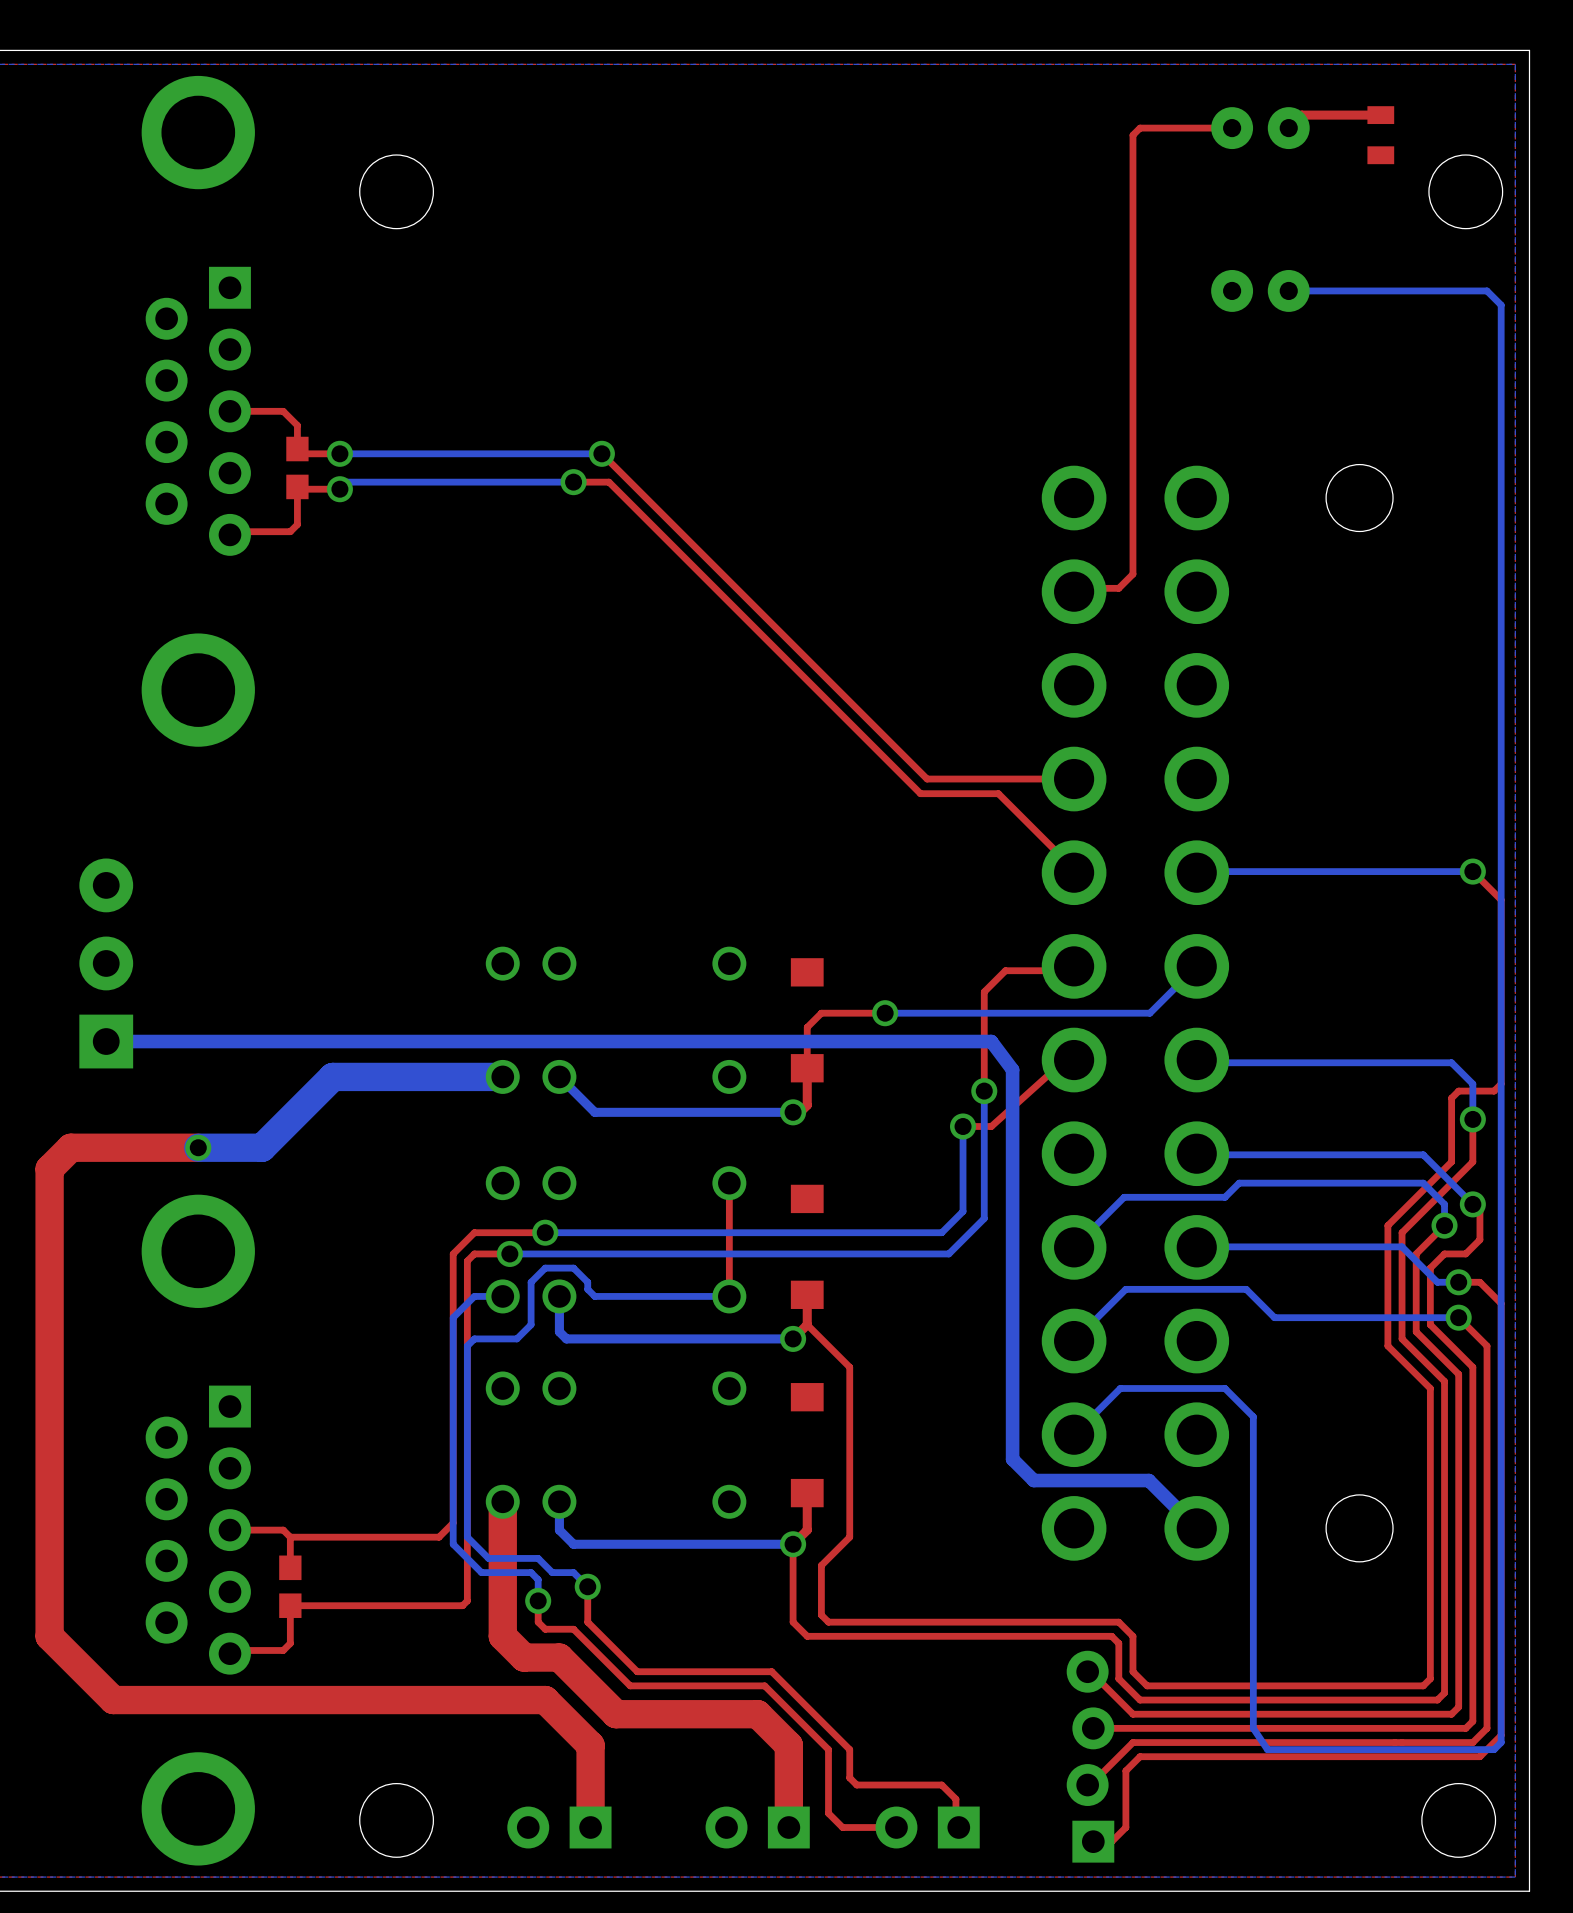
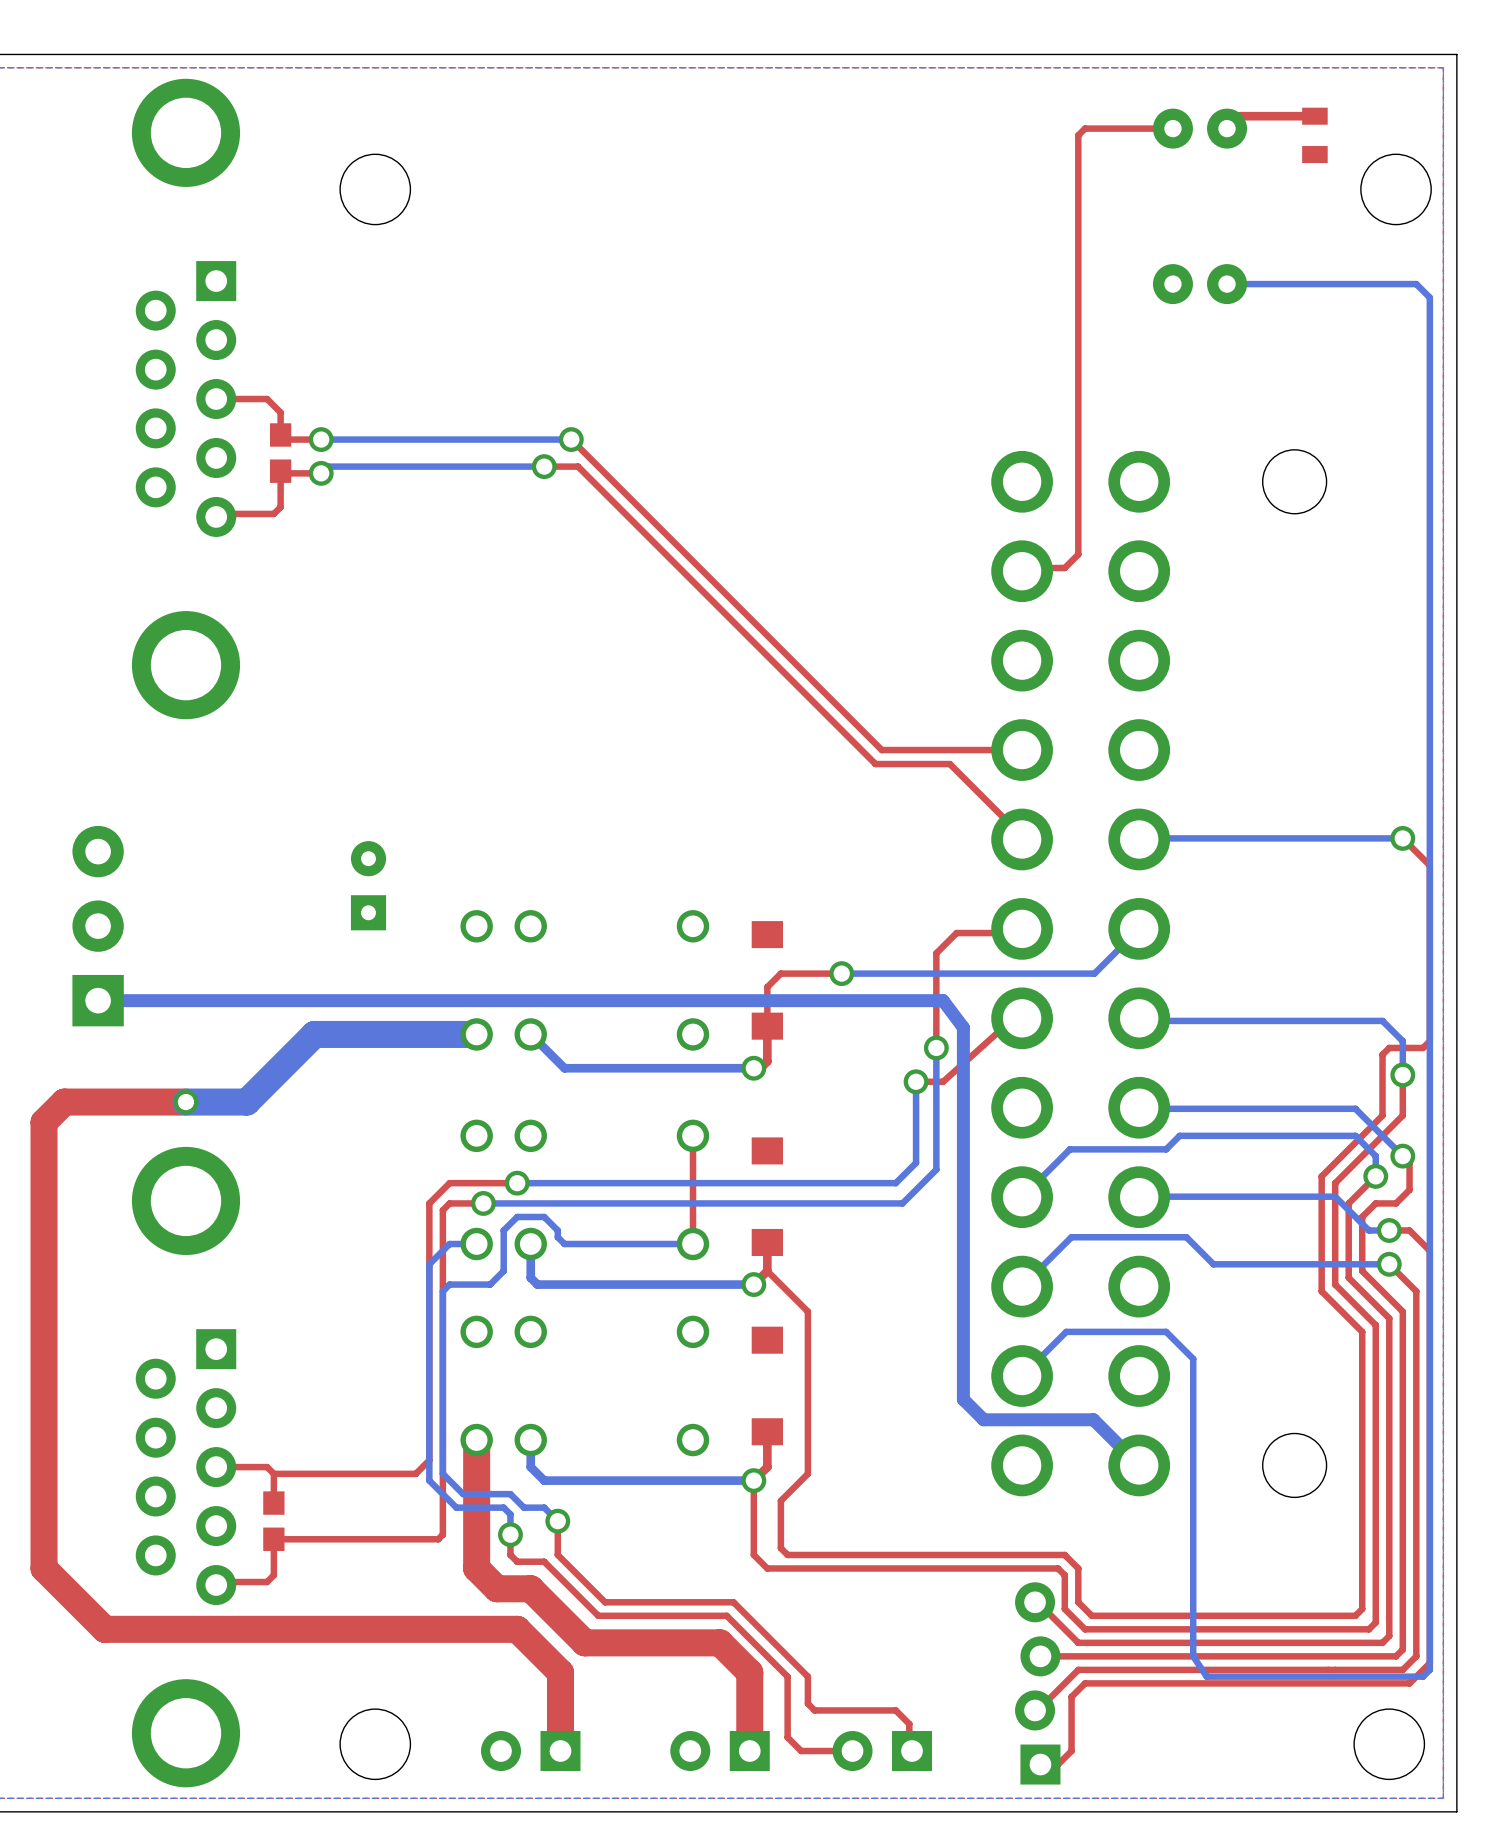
part: none -> (368, 885)

